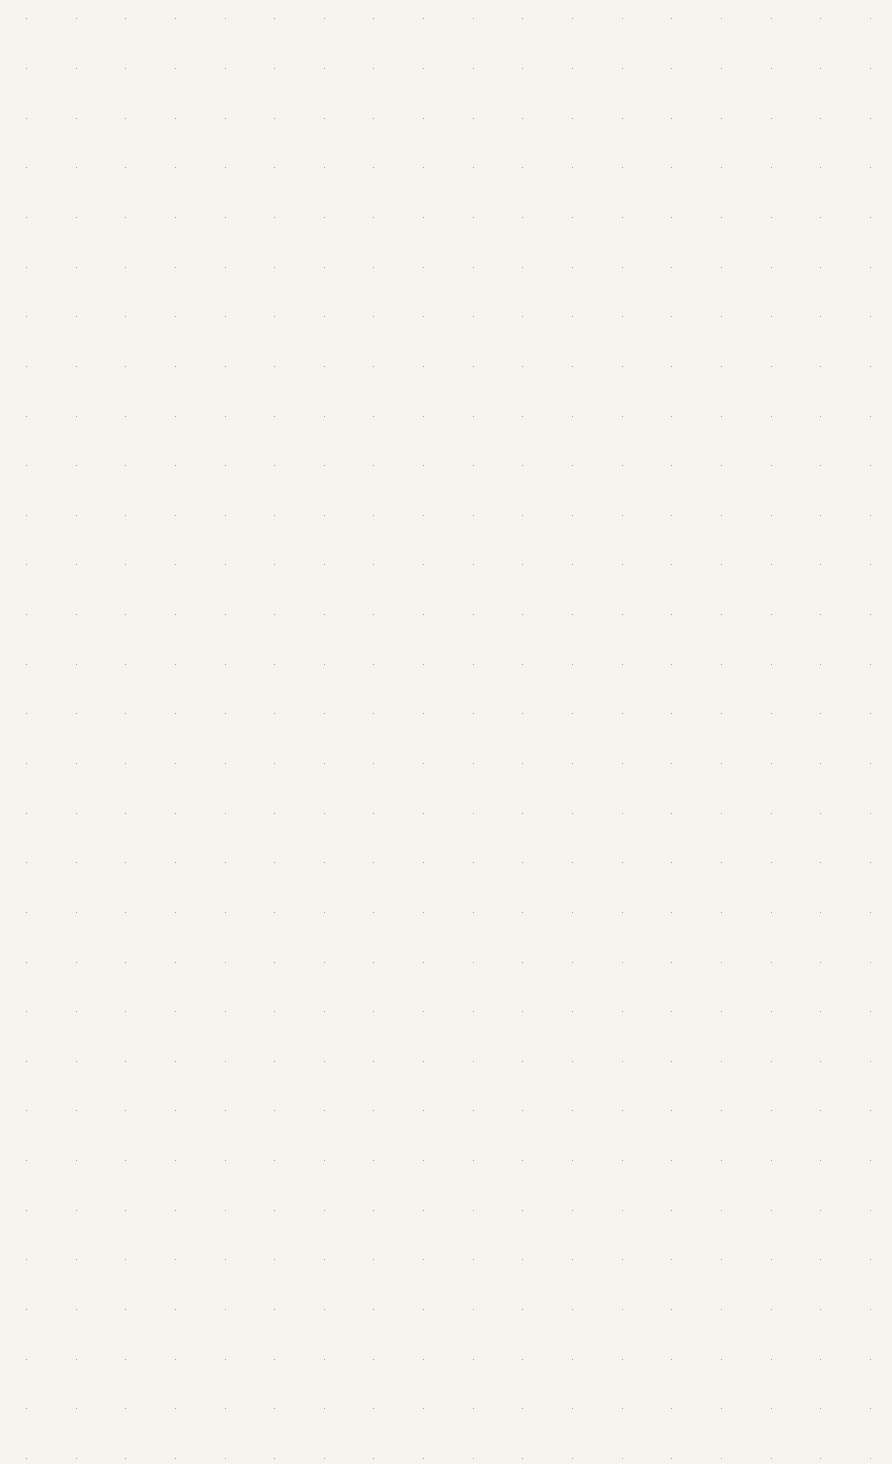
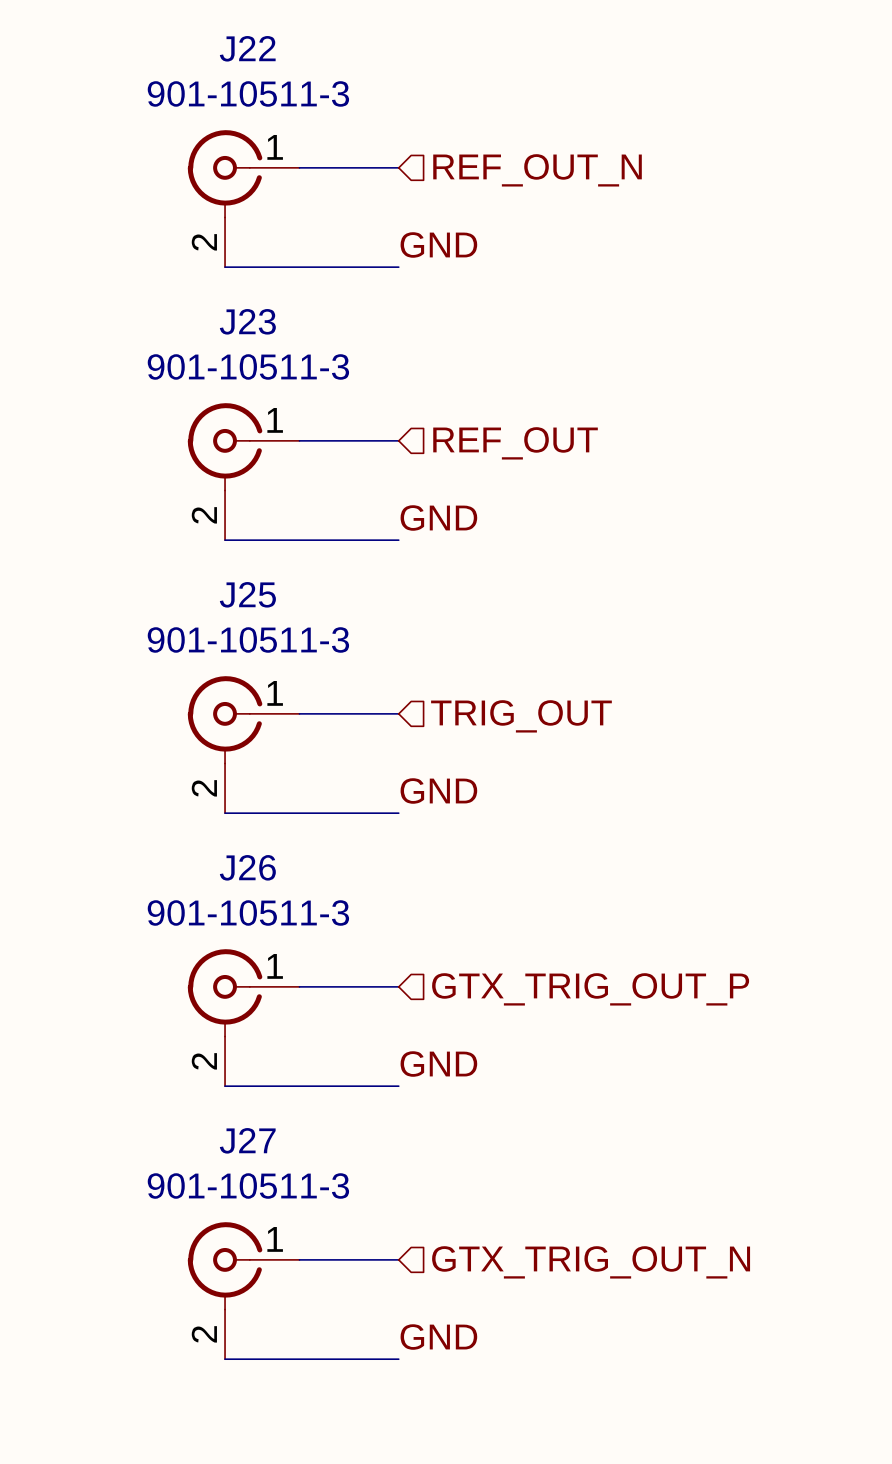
wire: none -> (299, 167) (398, 167)
hierarchical label: none -> REF_OUT_N (537, 170)
J22: none -> 901-10511-3 (243, 198)
label: none -> GND (438, 244)
wire: none -> (225, 267) (398, 267)
wire: none -> (299, 440) (398, 440)
hierarchical label: none -> REF_OUT (515, 443)
J23: none -> 901-10511-3 (243, 471)
label: none -> GND (438, 517)
wire: none -> (225, 540) (398, 540)
wire: none -> (299, 713) (398, 713)
hierarchical label: none -> TRIG_OUT (521, 716)
J25: none -> 901-10511-3 (243, 744)
label: none -> GND (438, 791)
wire: none -> (225, 813) (398, 813)
wire: none -> (299, 986) (398, 986)
hierarchical label: none -> GTX_TRIG_OUT_P (590, 989)
J26: none -> 901-10511-3 (243, 1017)
label: none -> GND (438, 1064)
wire: none -> (225, 1086) (398, 1086)
wire: none -> (299, 1259) (398, 1259)
hierarchical label: none -> GTX_TRIG_OUT_N (591, 1262)
J27: none -> 901-10511-3 (243, 1290)
label: none -> GND (438, 1337)
wire: none -> (225, 1359) (398, 1359)

